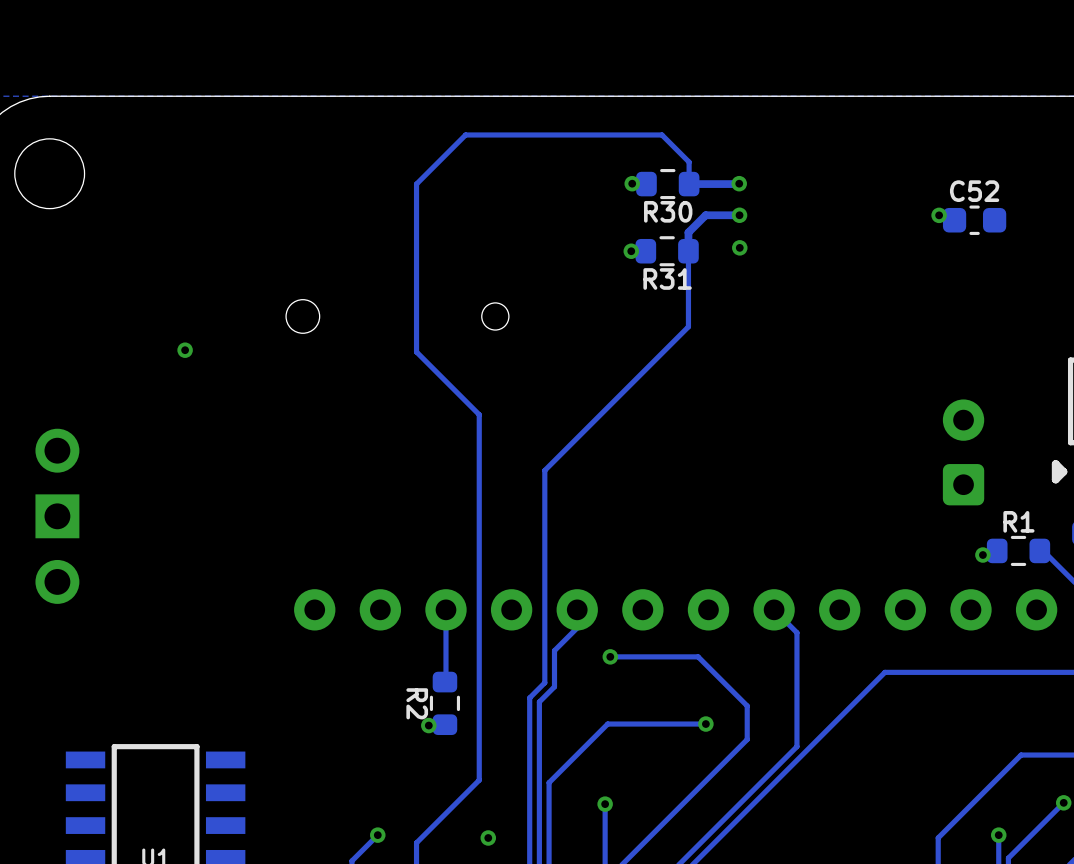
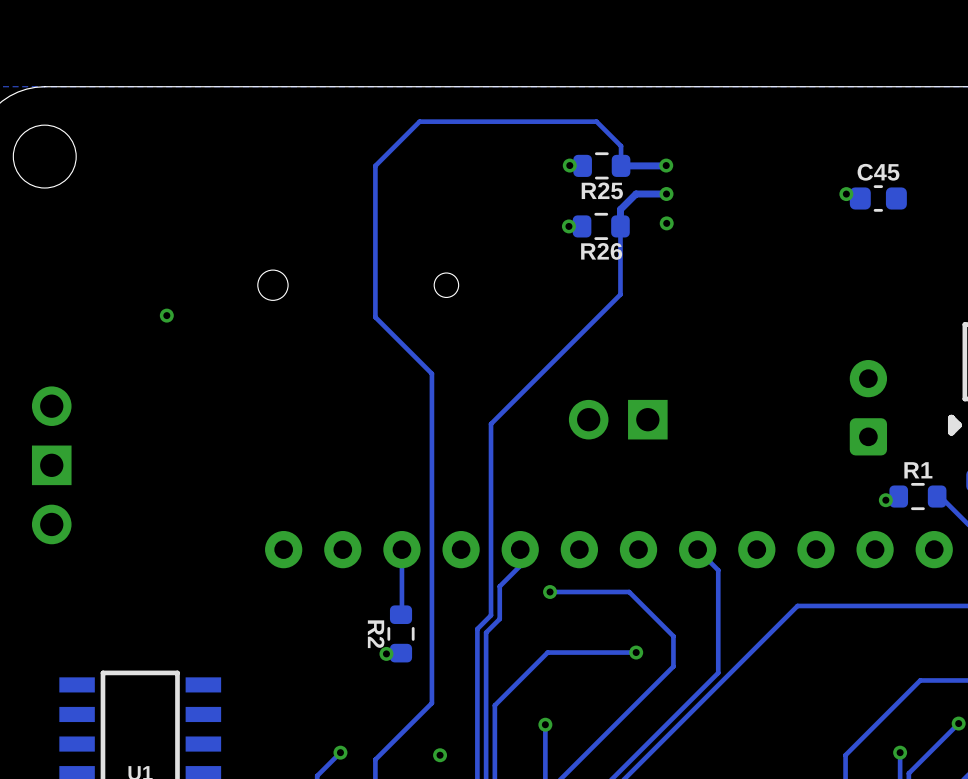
C52 name: C52 (974, 191) -> C45 (878, 172)
R30 name: R30 (668, 211) -> R25 (602, 190)
R31 name: R31 (667, 278) -> R26 (601, 251)
part: none -> (618, 419)

